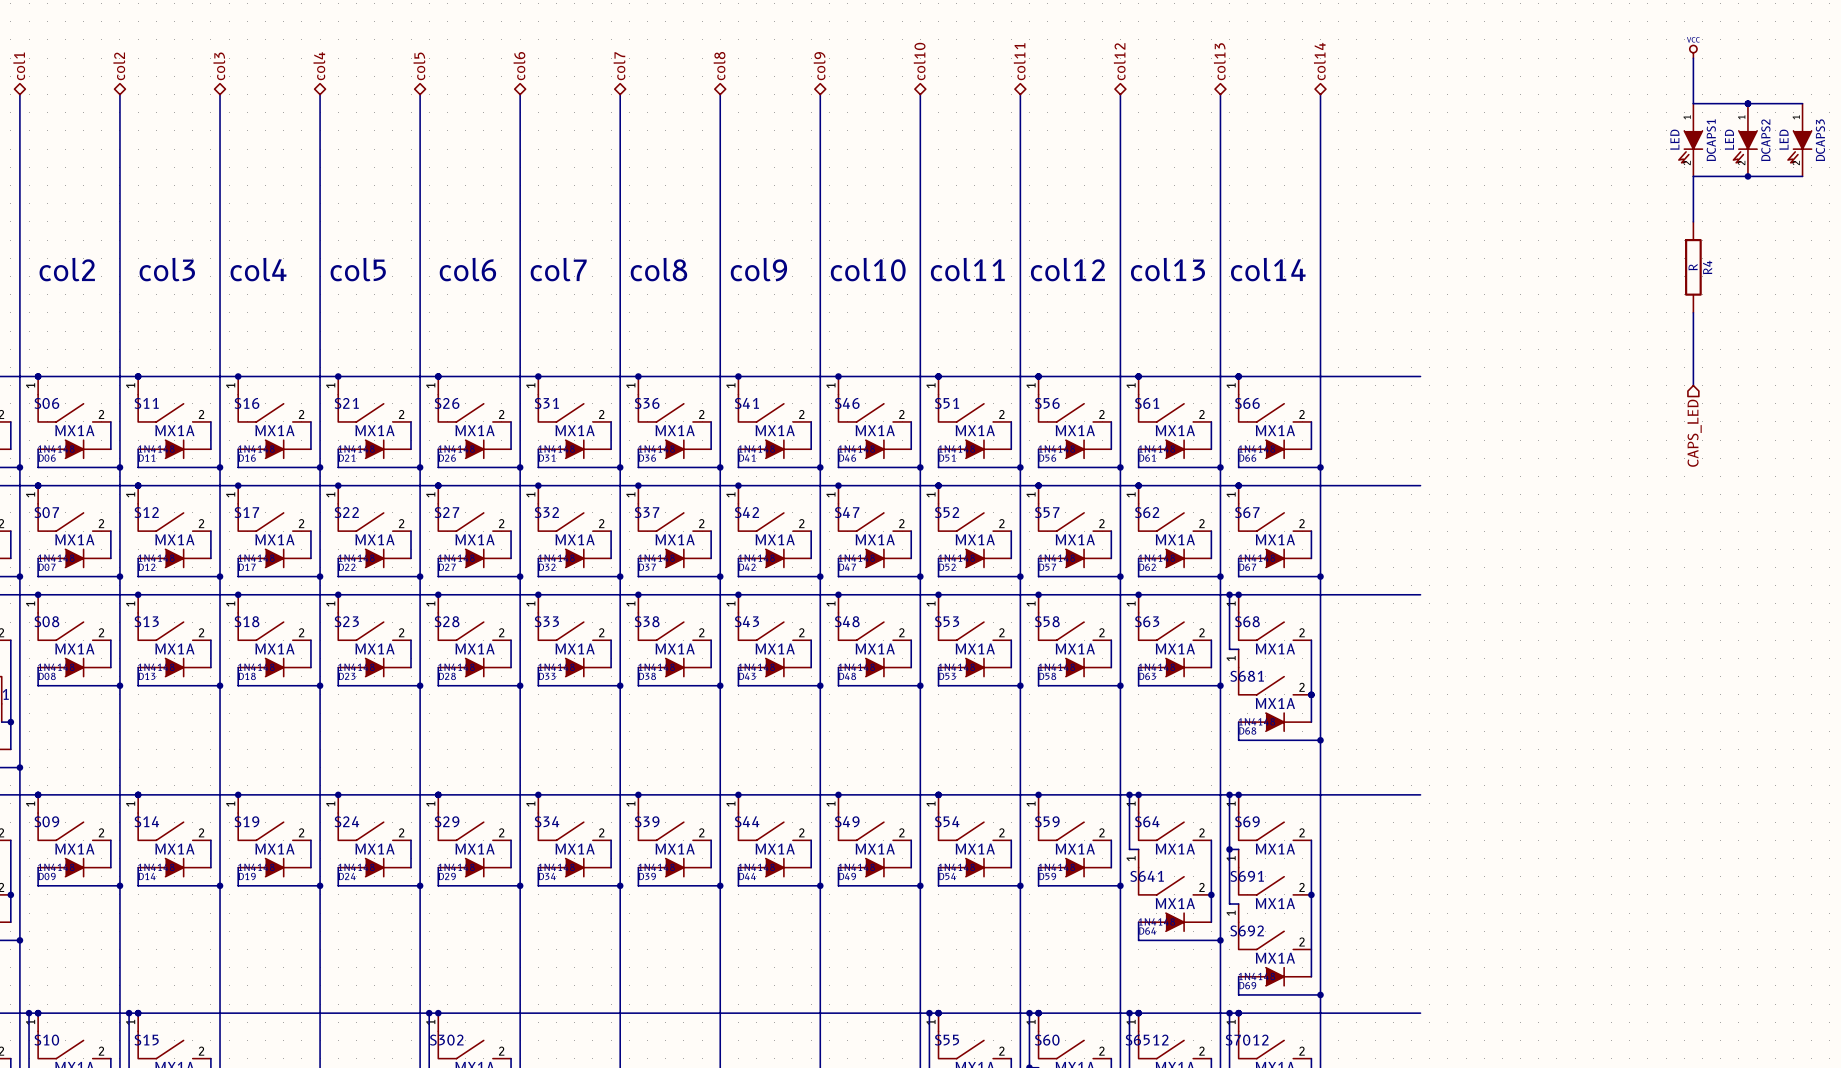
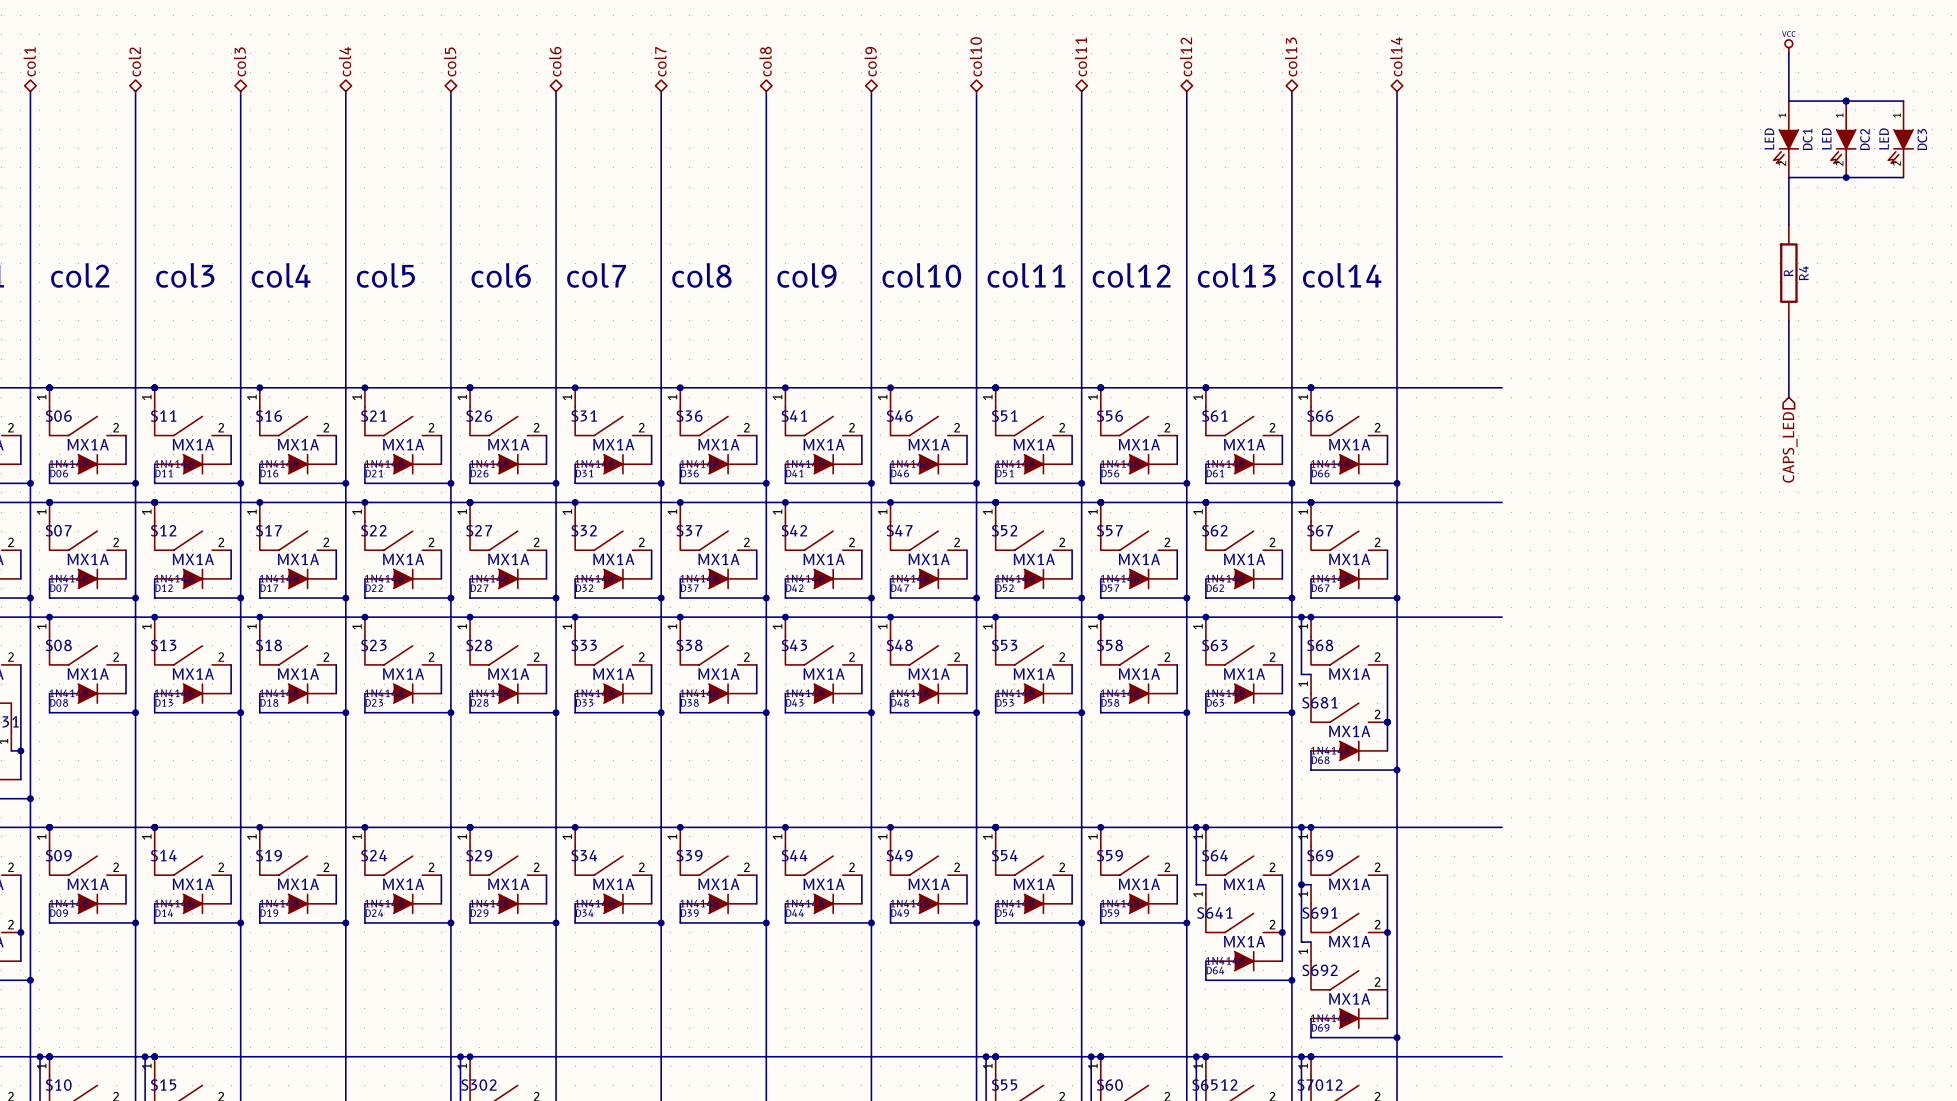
DCAPS1 name: DCAPS1 (1711, 140) -> DC1 (1807, 139)
DCAPS2 name: DCAPS2 (1765, 140) -> DC2 (1865, 139)
DCAPS3 name: DCAPS3 (1820, 140) -> DC3 (1922, 139)

